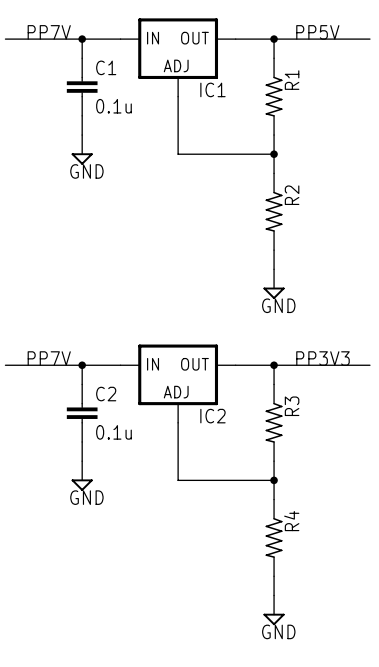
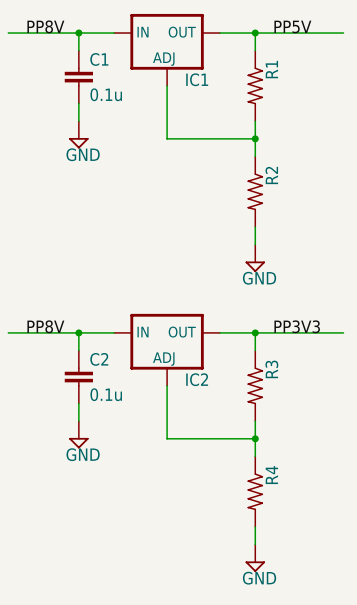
label: PP7V (49, 32) -> PP8V (45, 26)
label: PP7V (49, 358) -> PP8V (45, 326)

